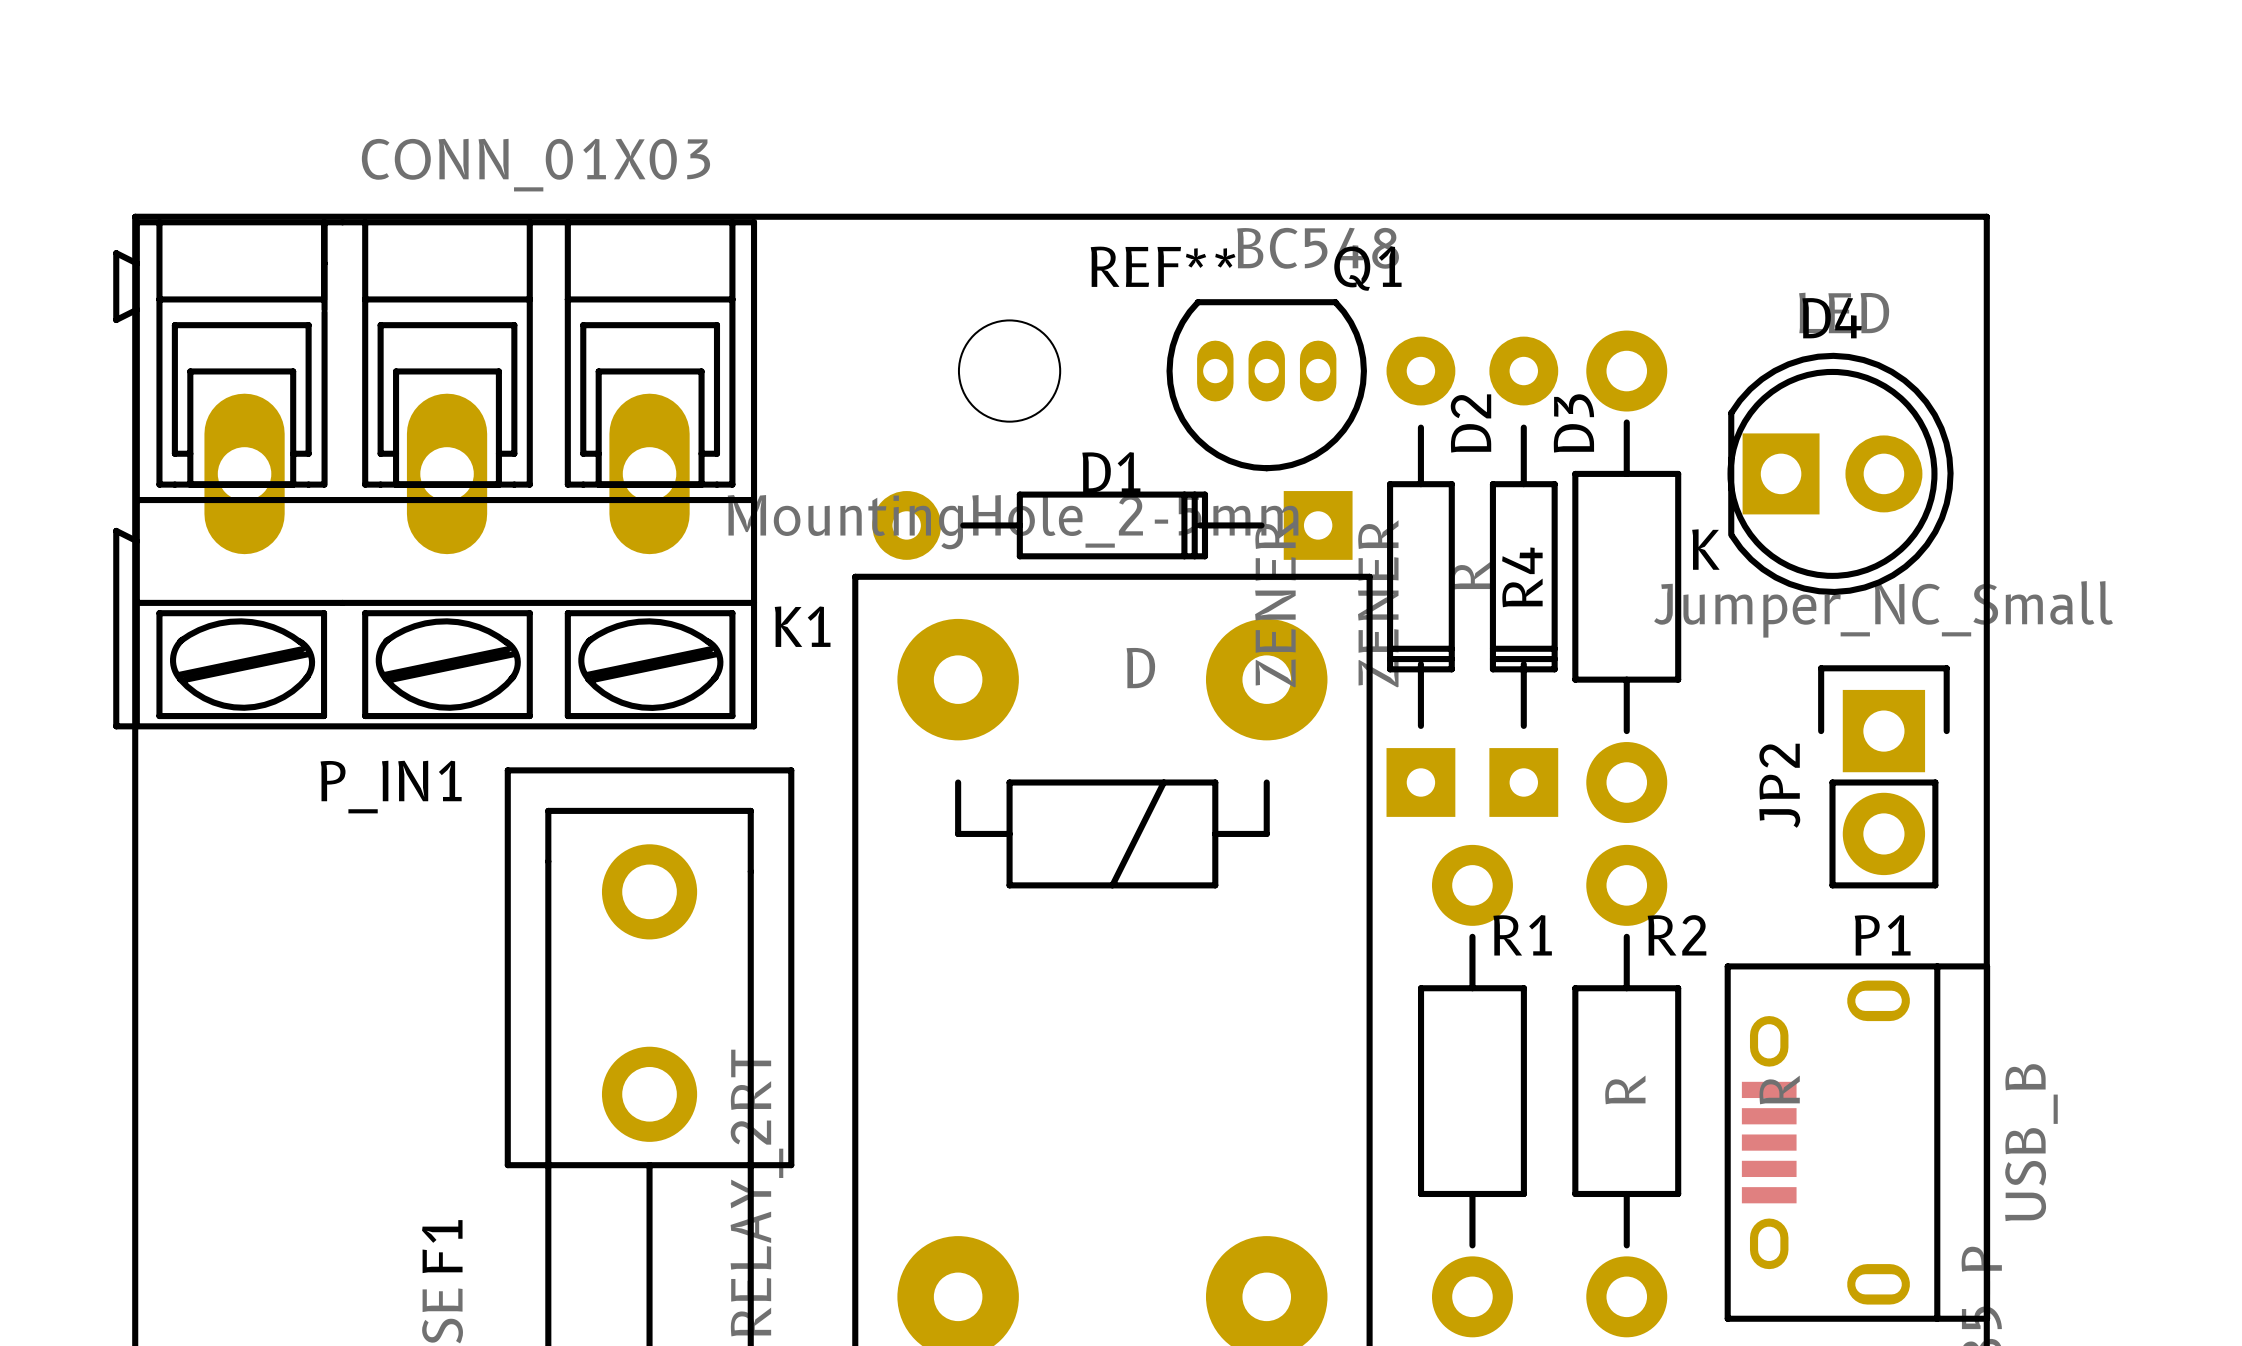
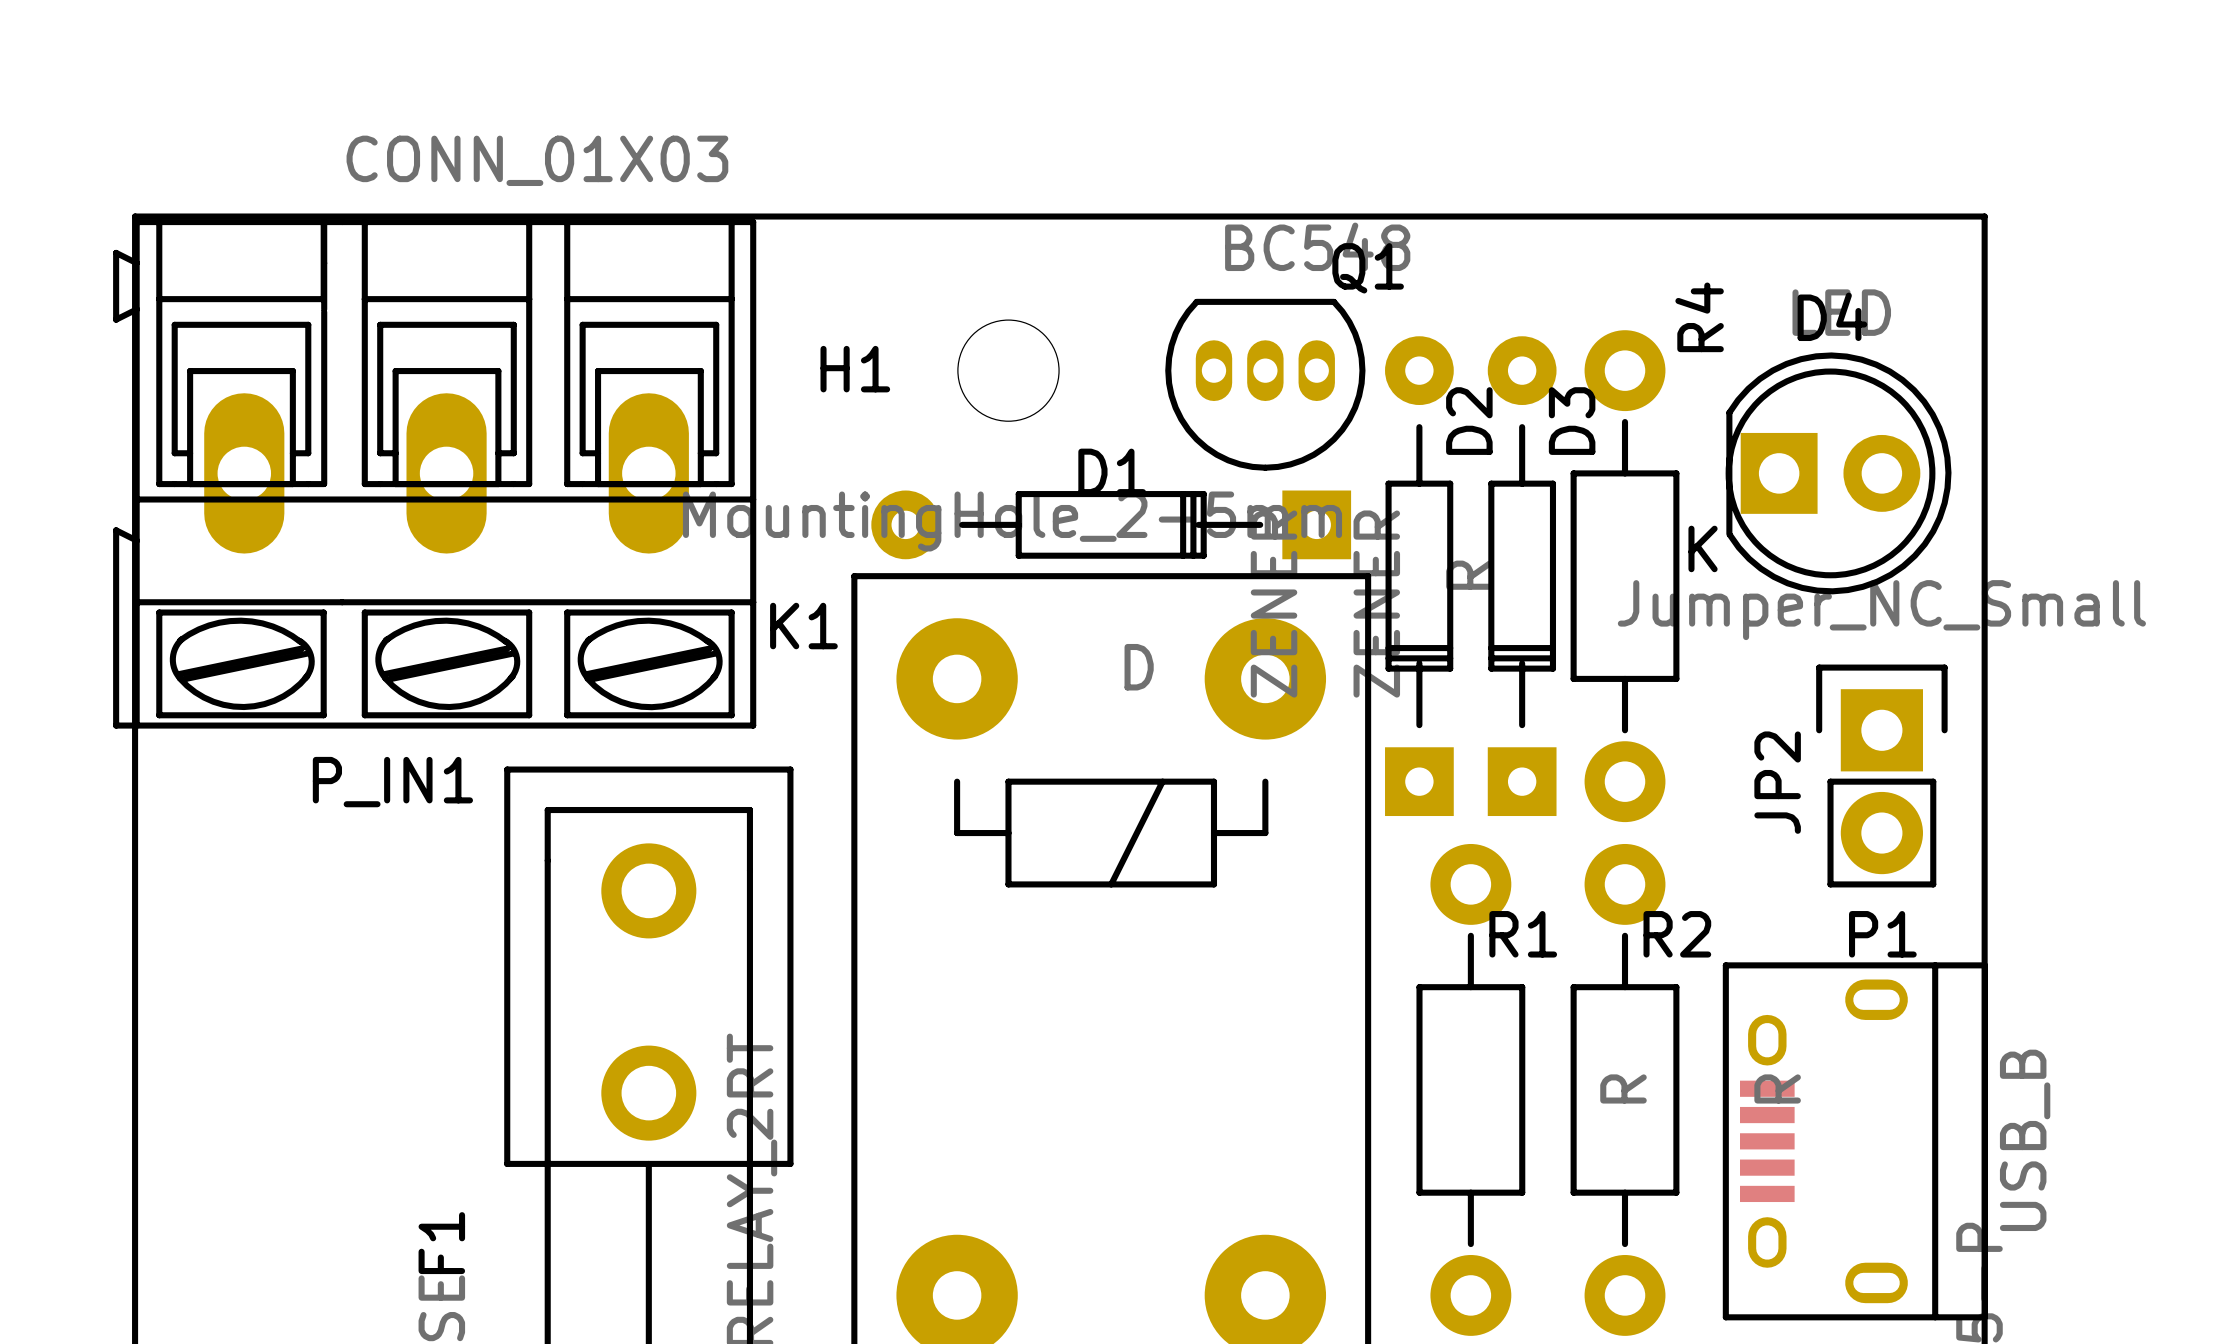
REF** name: REF** (1163, 266) -> H1 (855, 369)
R4 name position: R4 (1522, 577) -> R4 (1699, 317)

